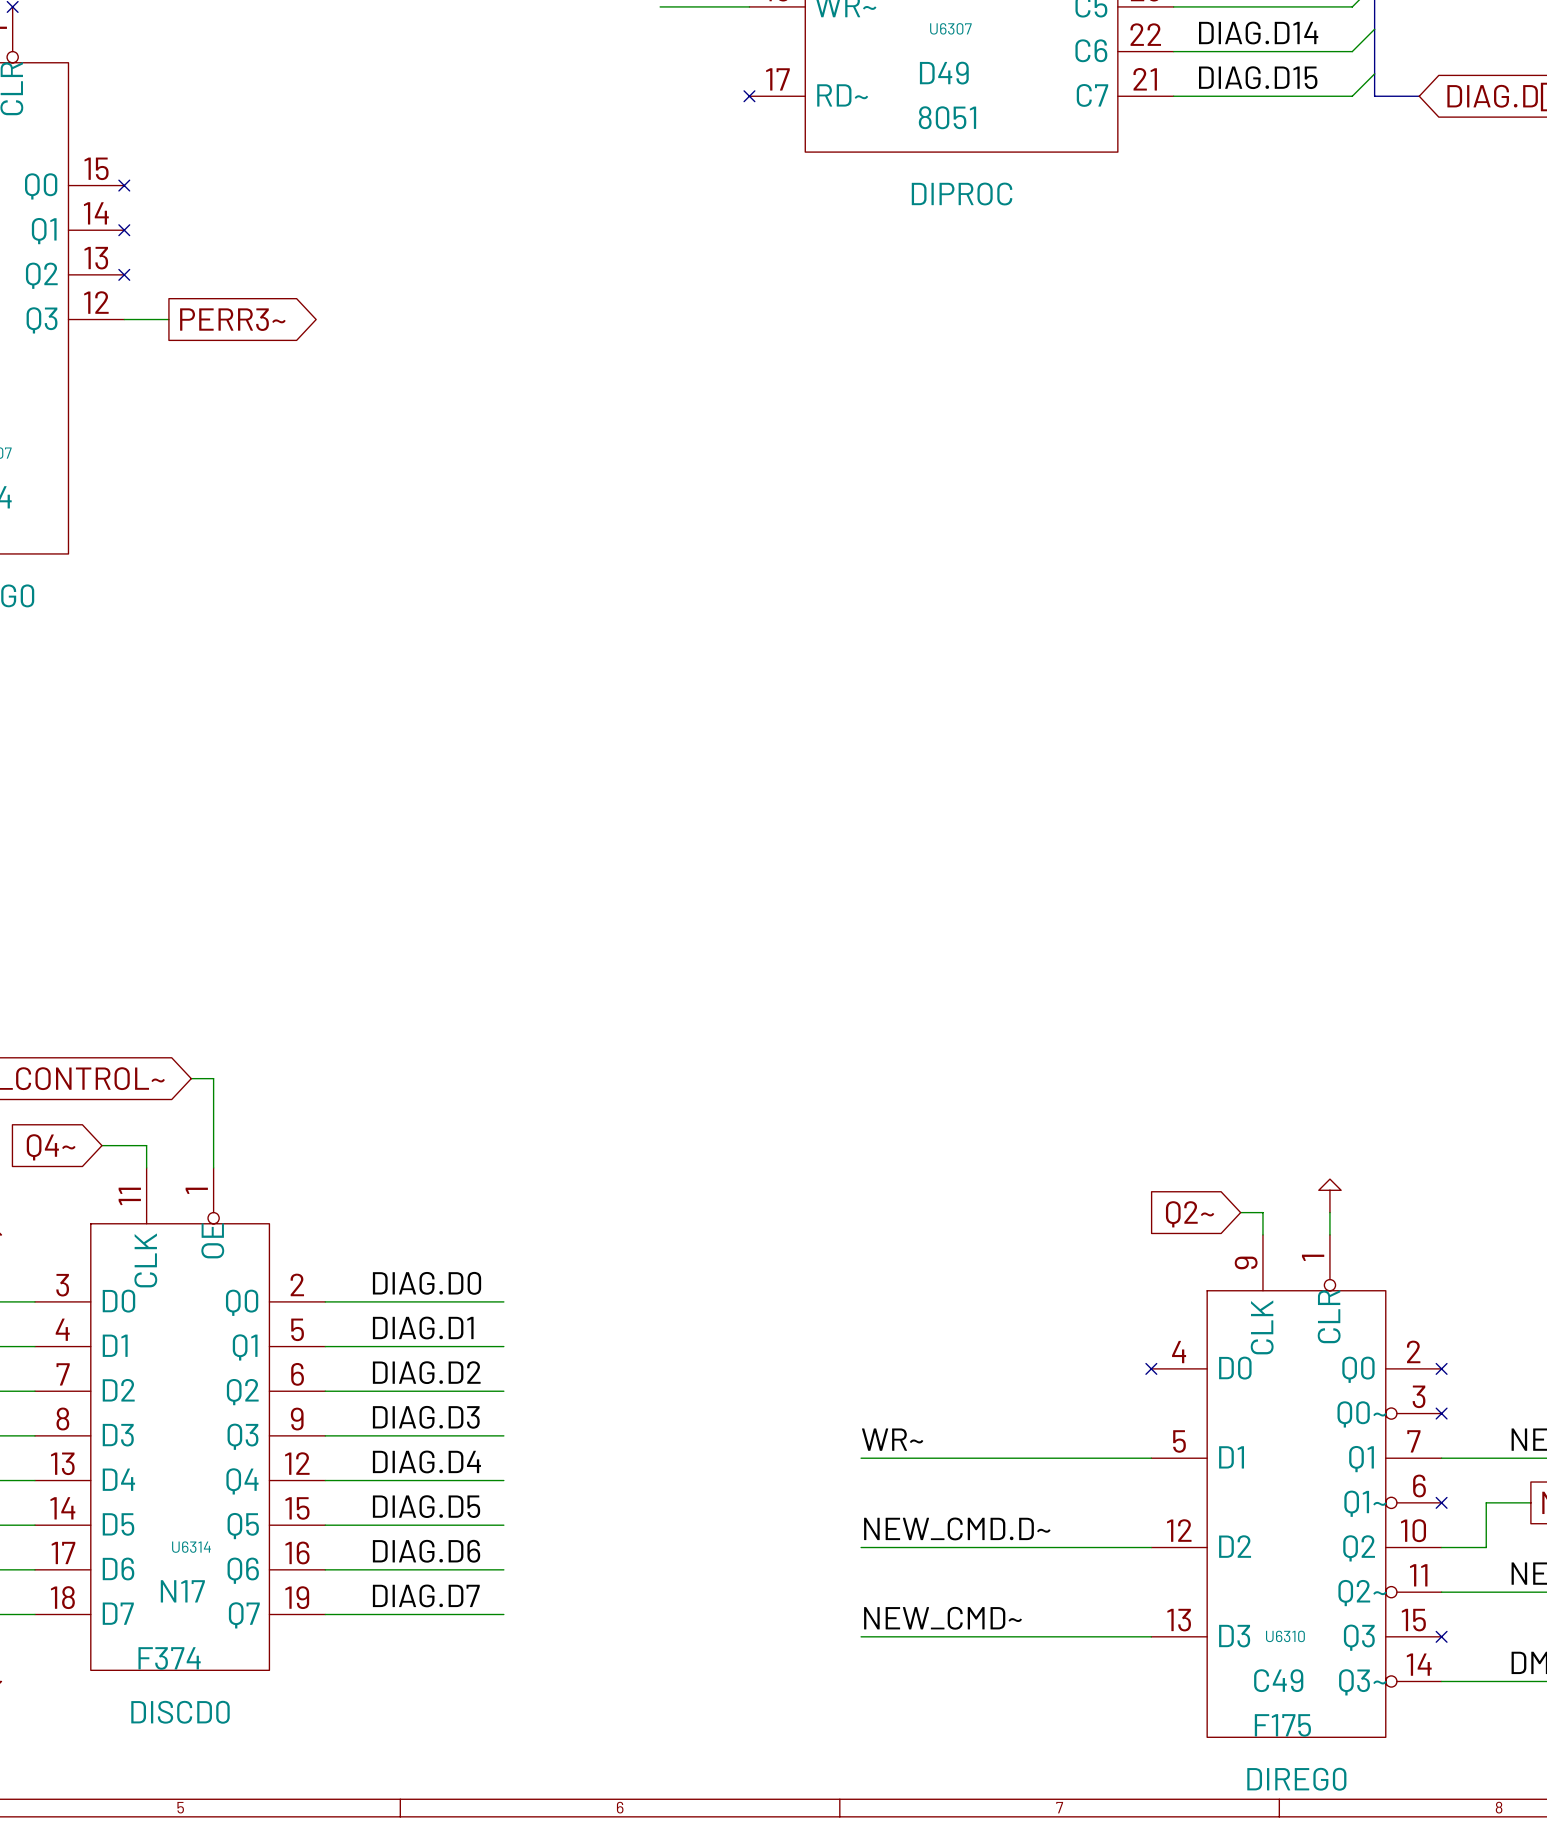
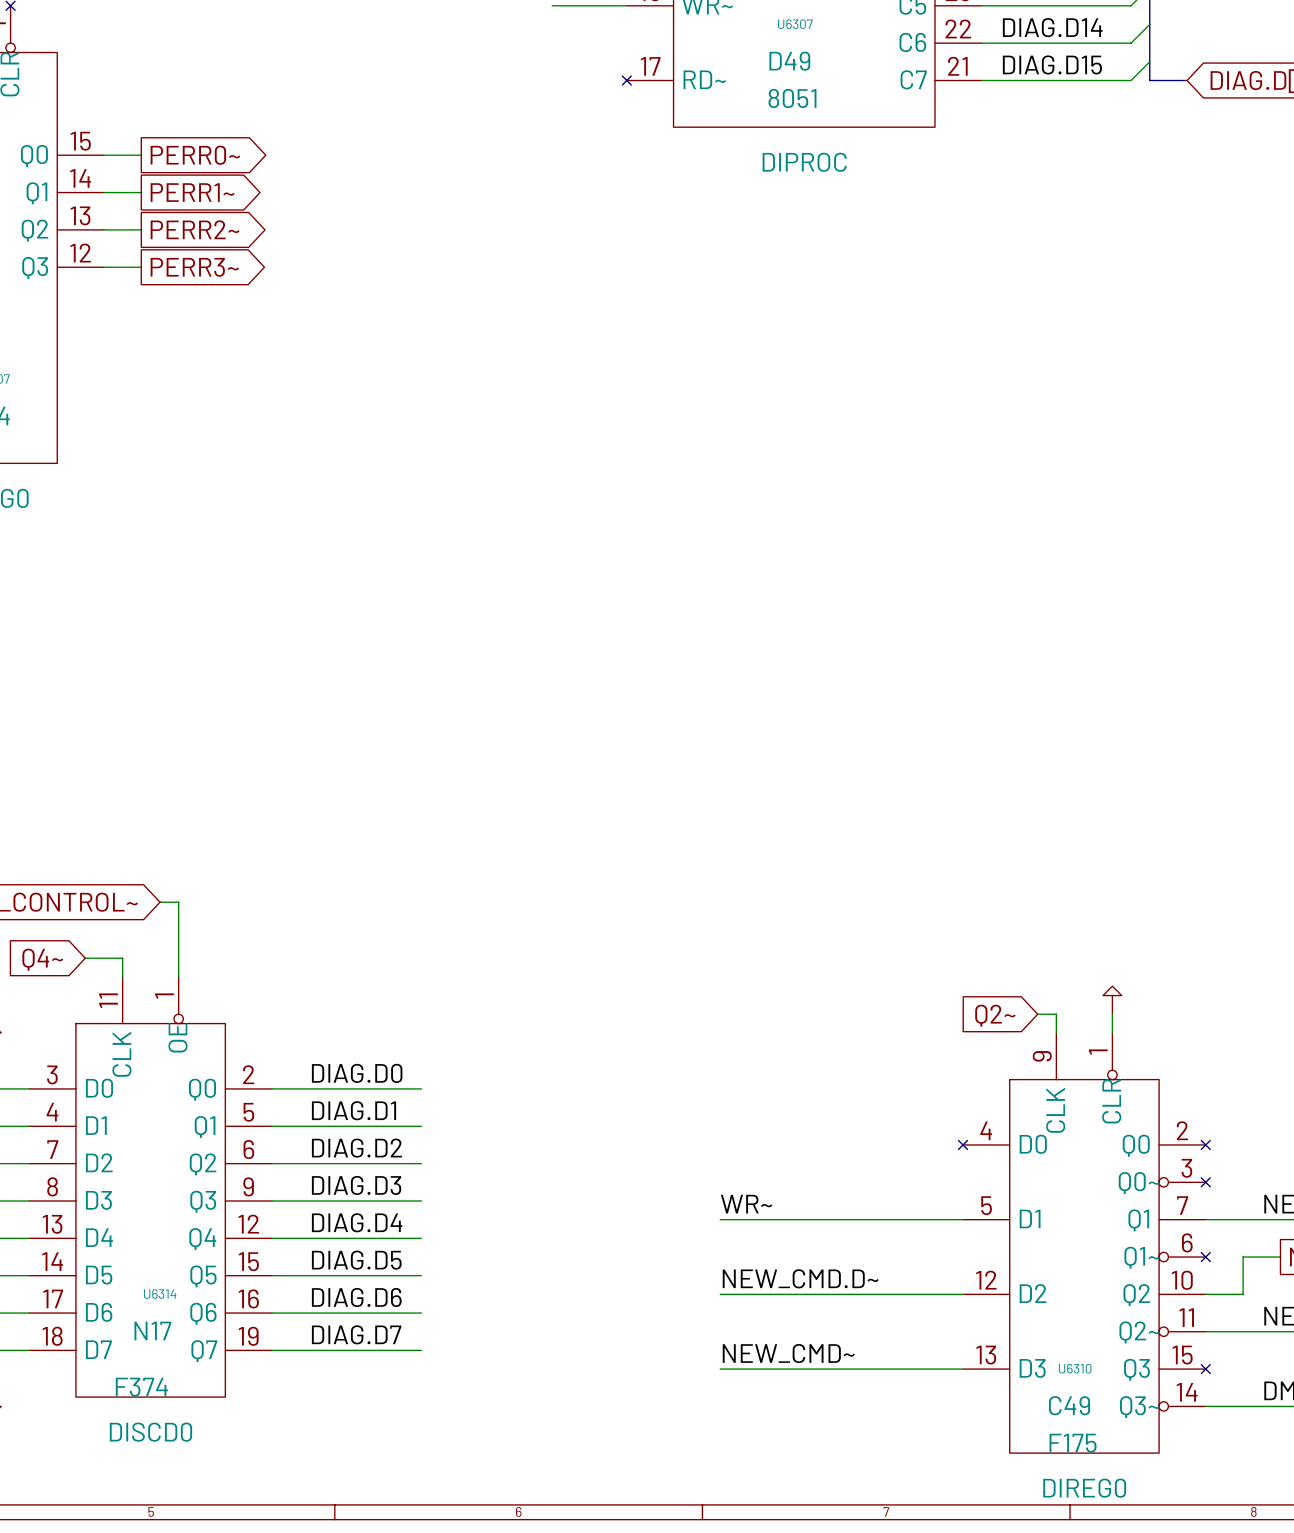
wire: none -> (103, 155) (141, 155)
no-connect mark: (124, 185) -> none
global label: none -> PERR0~ (195, 155)
wire: none -> (103, 192) (141, 192)
no-connect mark: (124, 230) -> none
global label: none -> PERR1~ (192, 192)
wire: none -> (103, 229) (141, 229)
no-connect mark: (124, 274) -> none
global label: none -> PERR2~ (195, 229)

